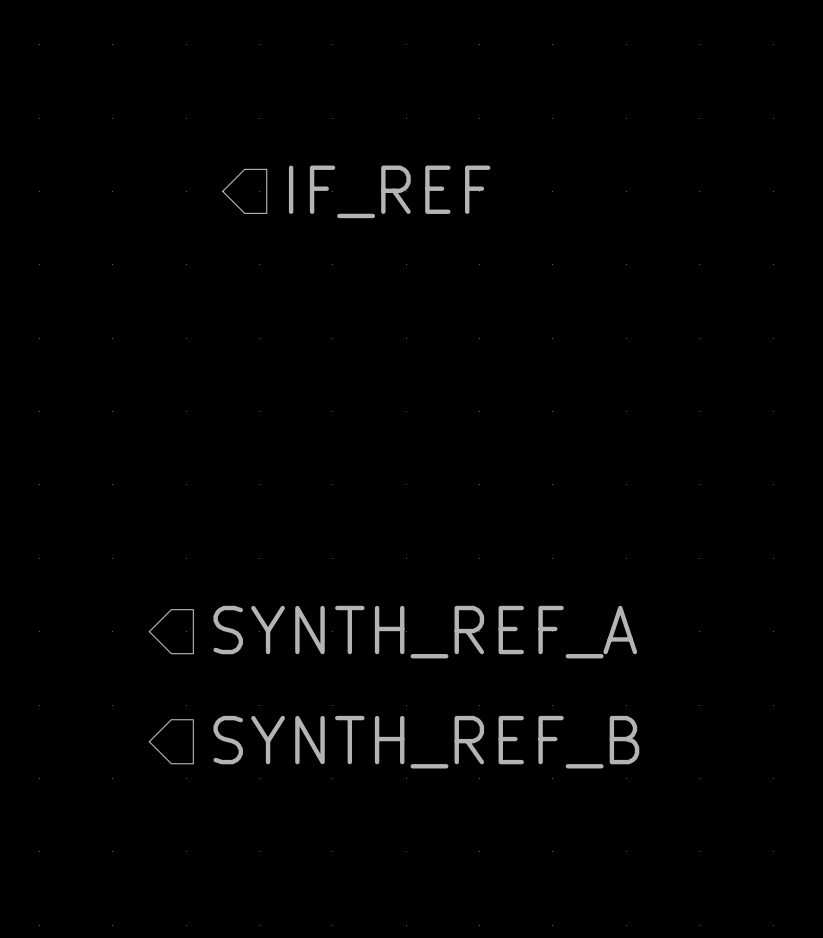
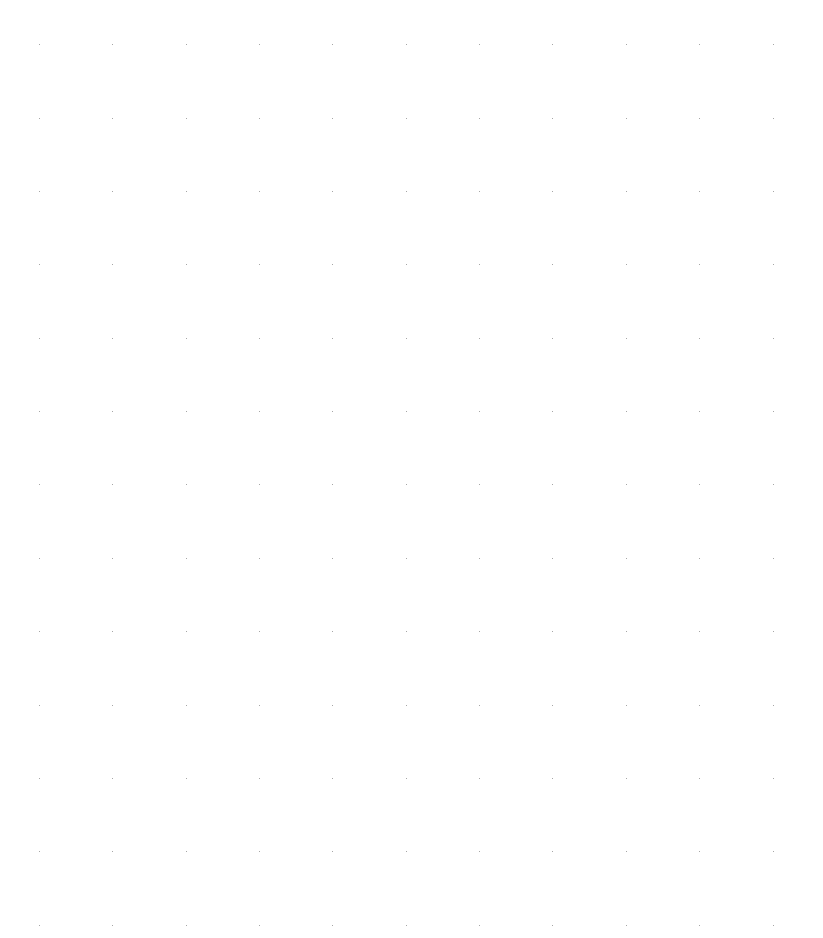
hierarchical label: IF_REF (389, 191) -> none
hierarchical label: SYNTH_REF_A (425, 632) -> none
hierarchical label: SYNTH_REF_B (426, 742) -> none

